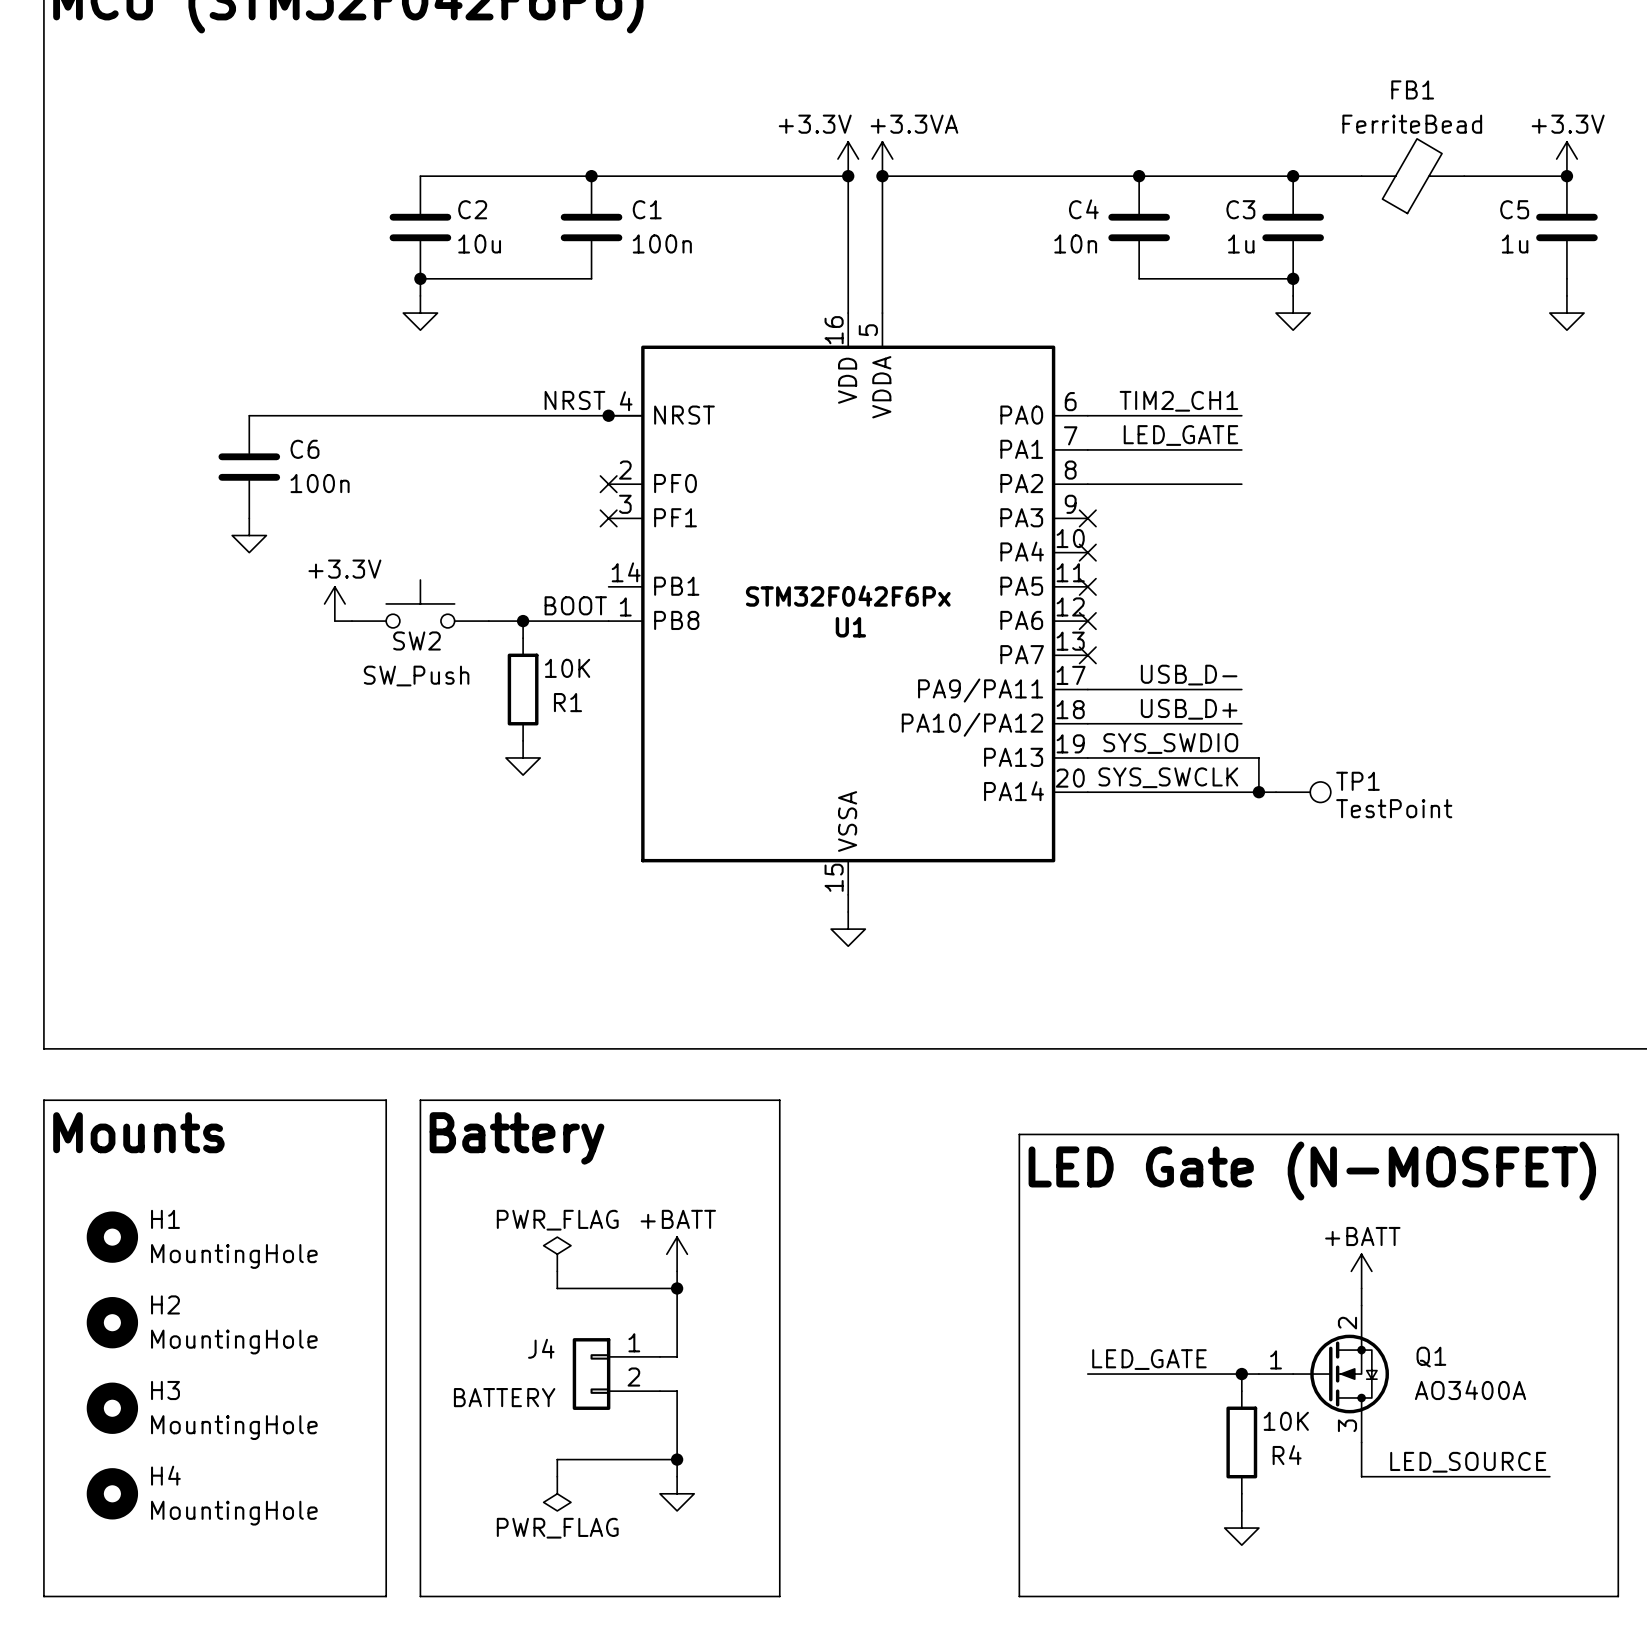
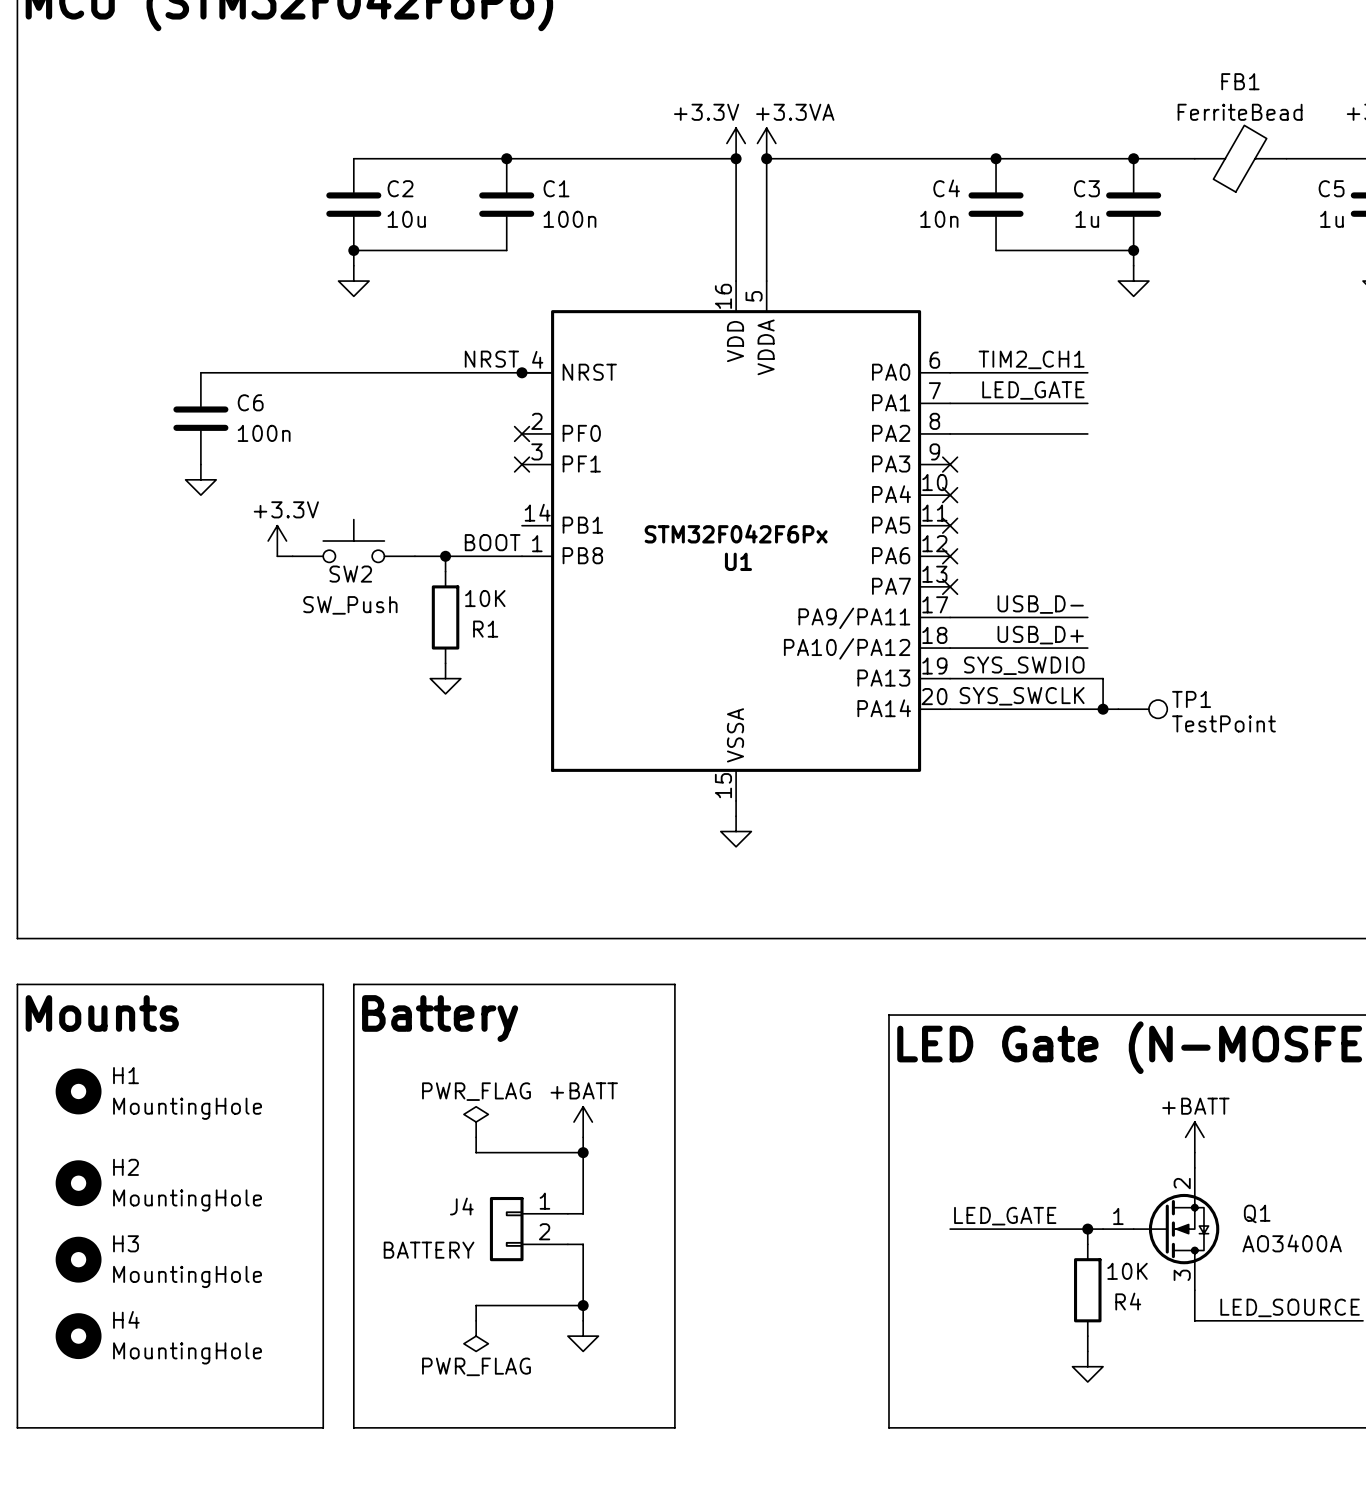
H1 position: (112, 1237) -> (78, 1091)

